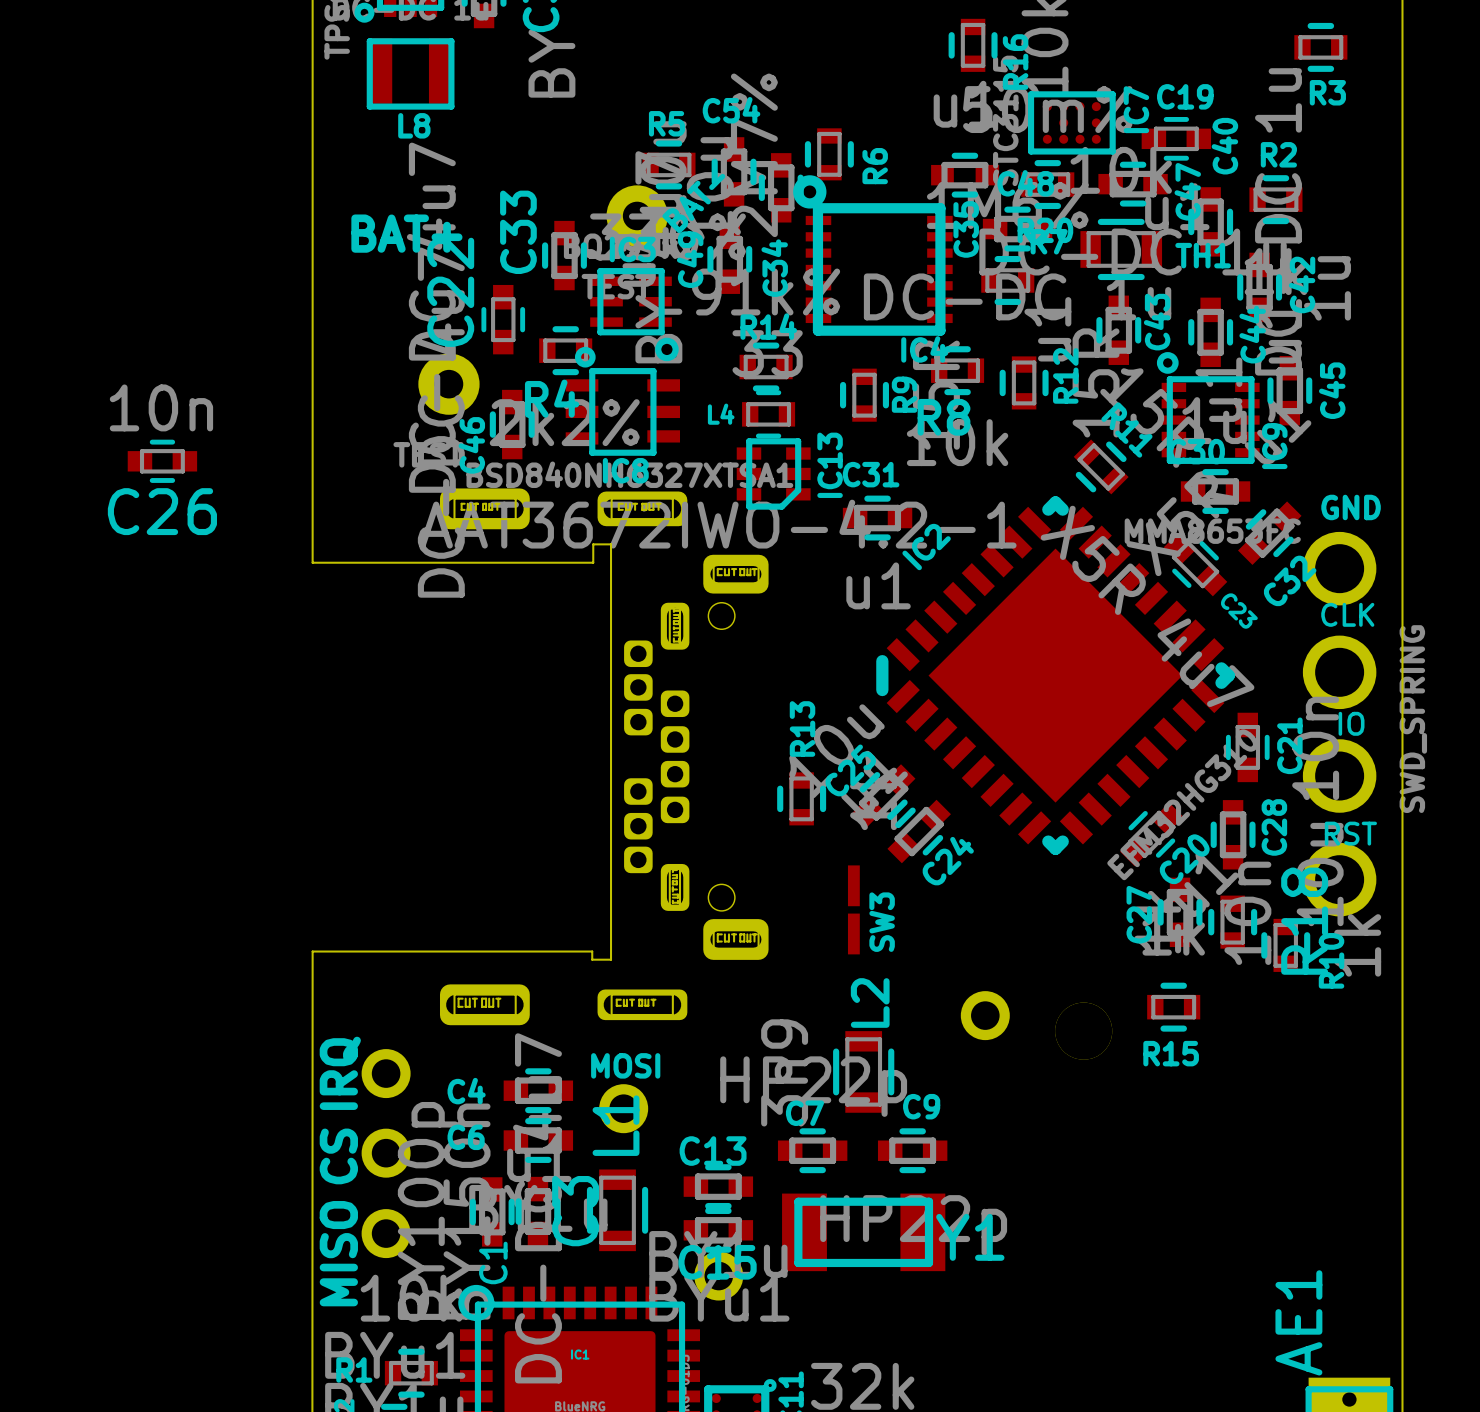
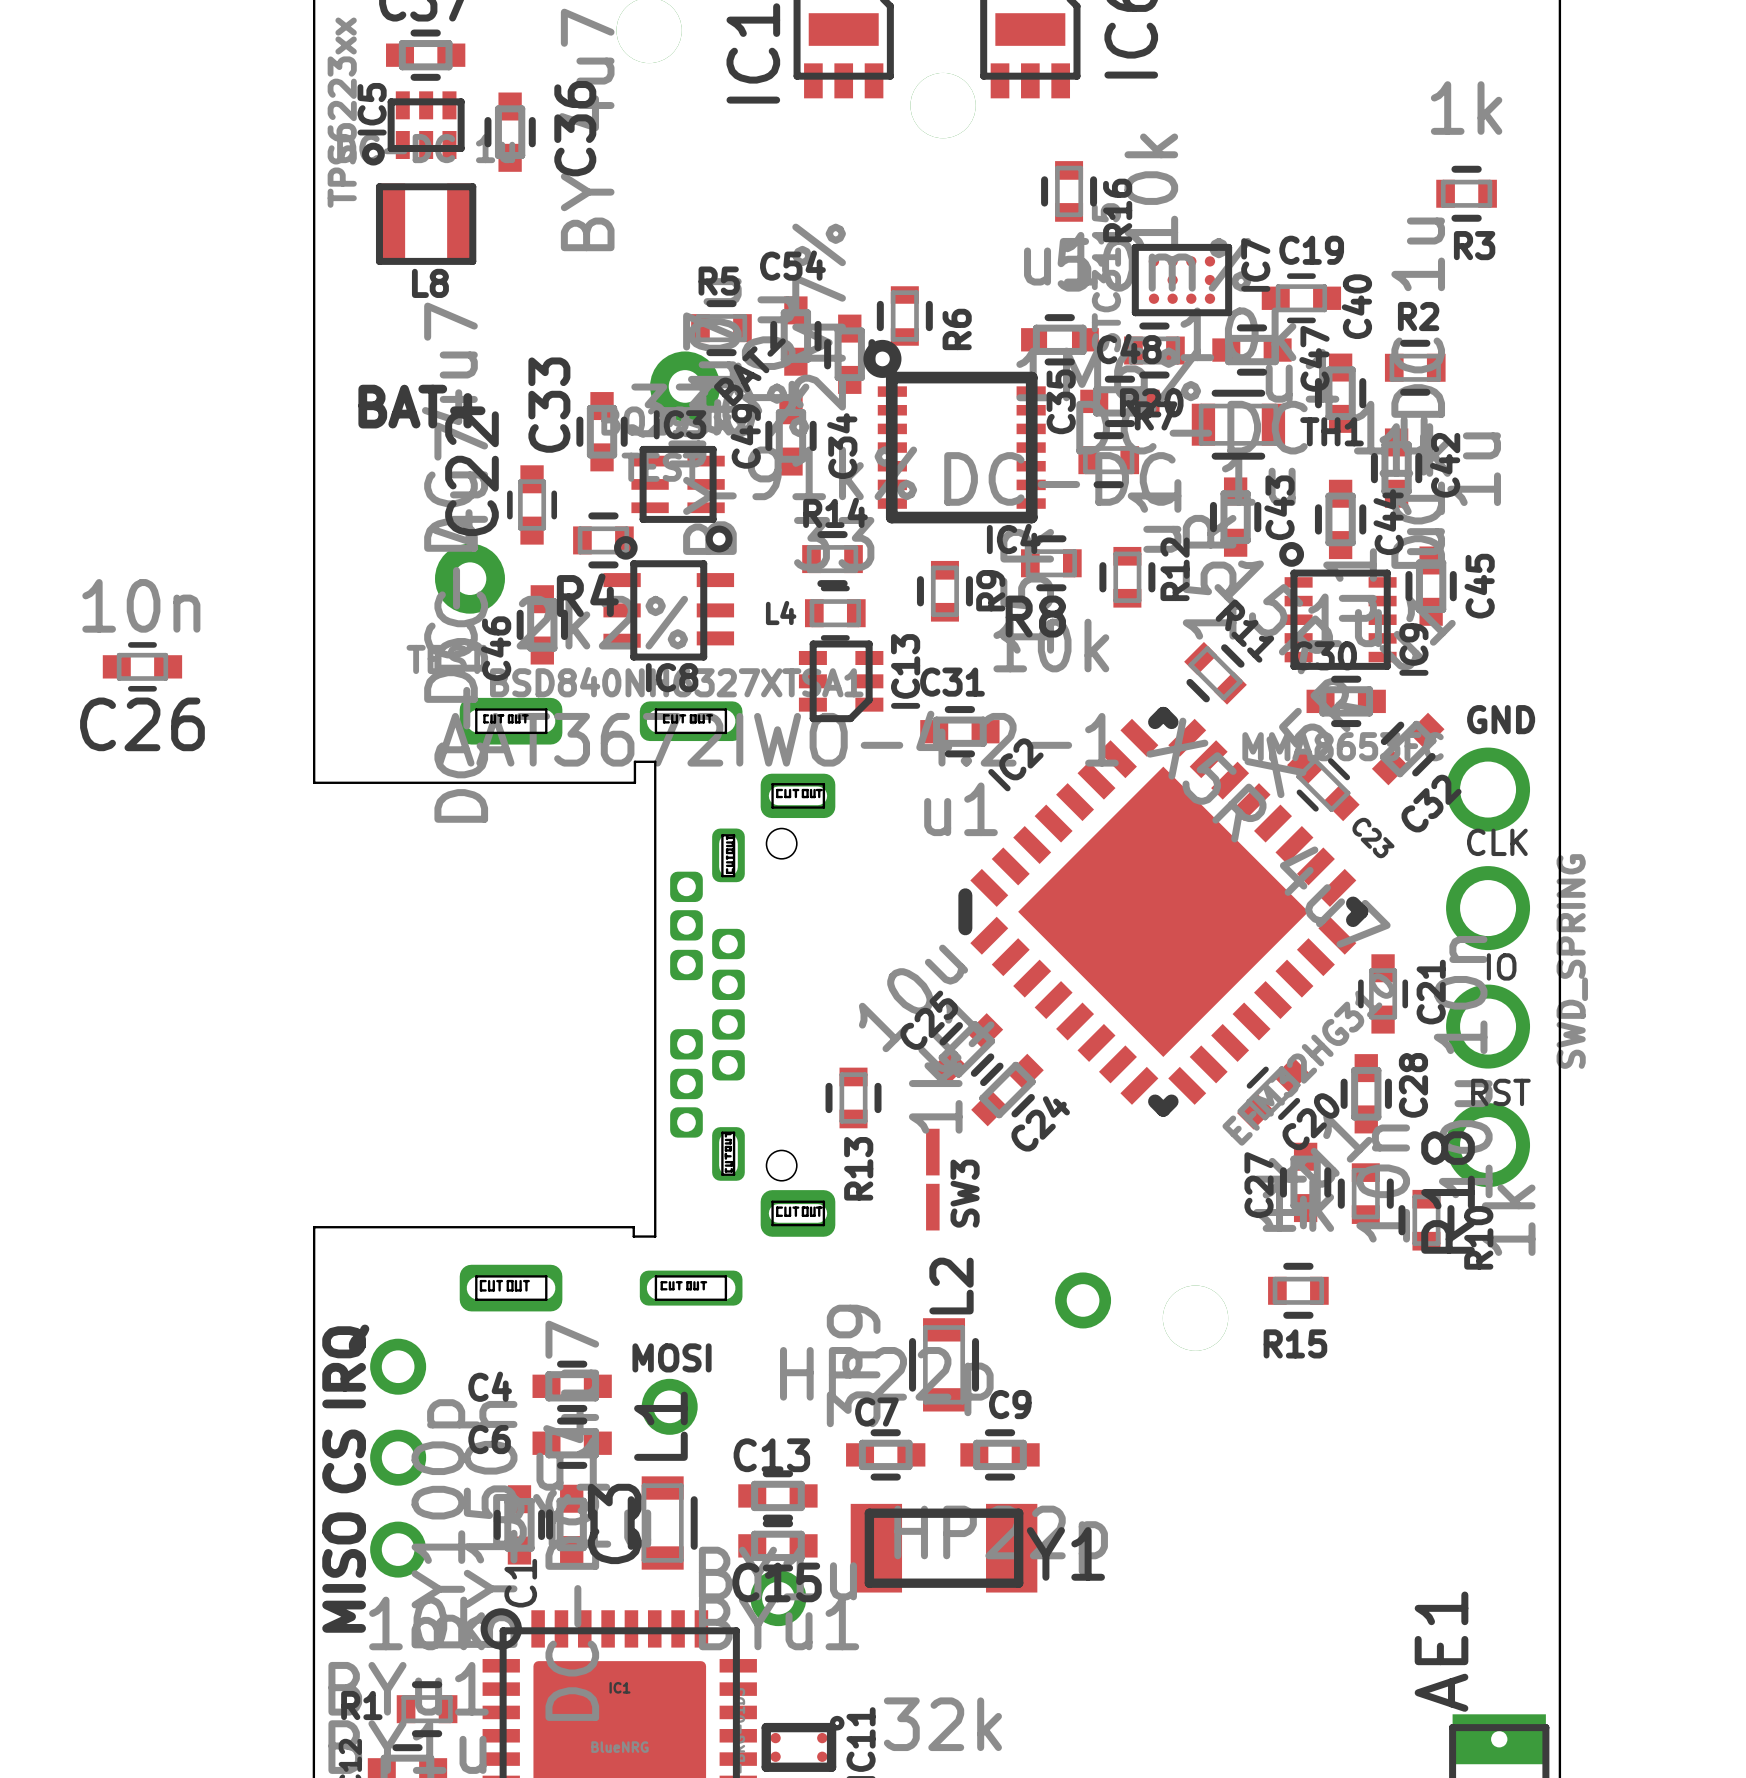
R13 name position: R13 (802, 728) -> R13 (858, 1168)
R13 position: (801, 798) -> (853, 1097)

